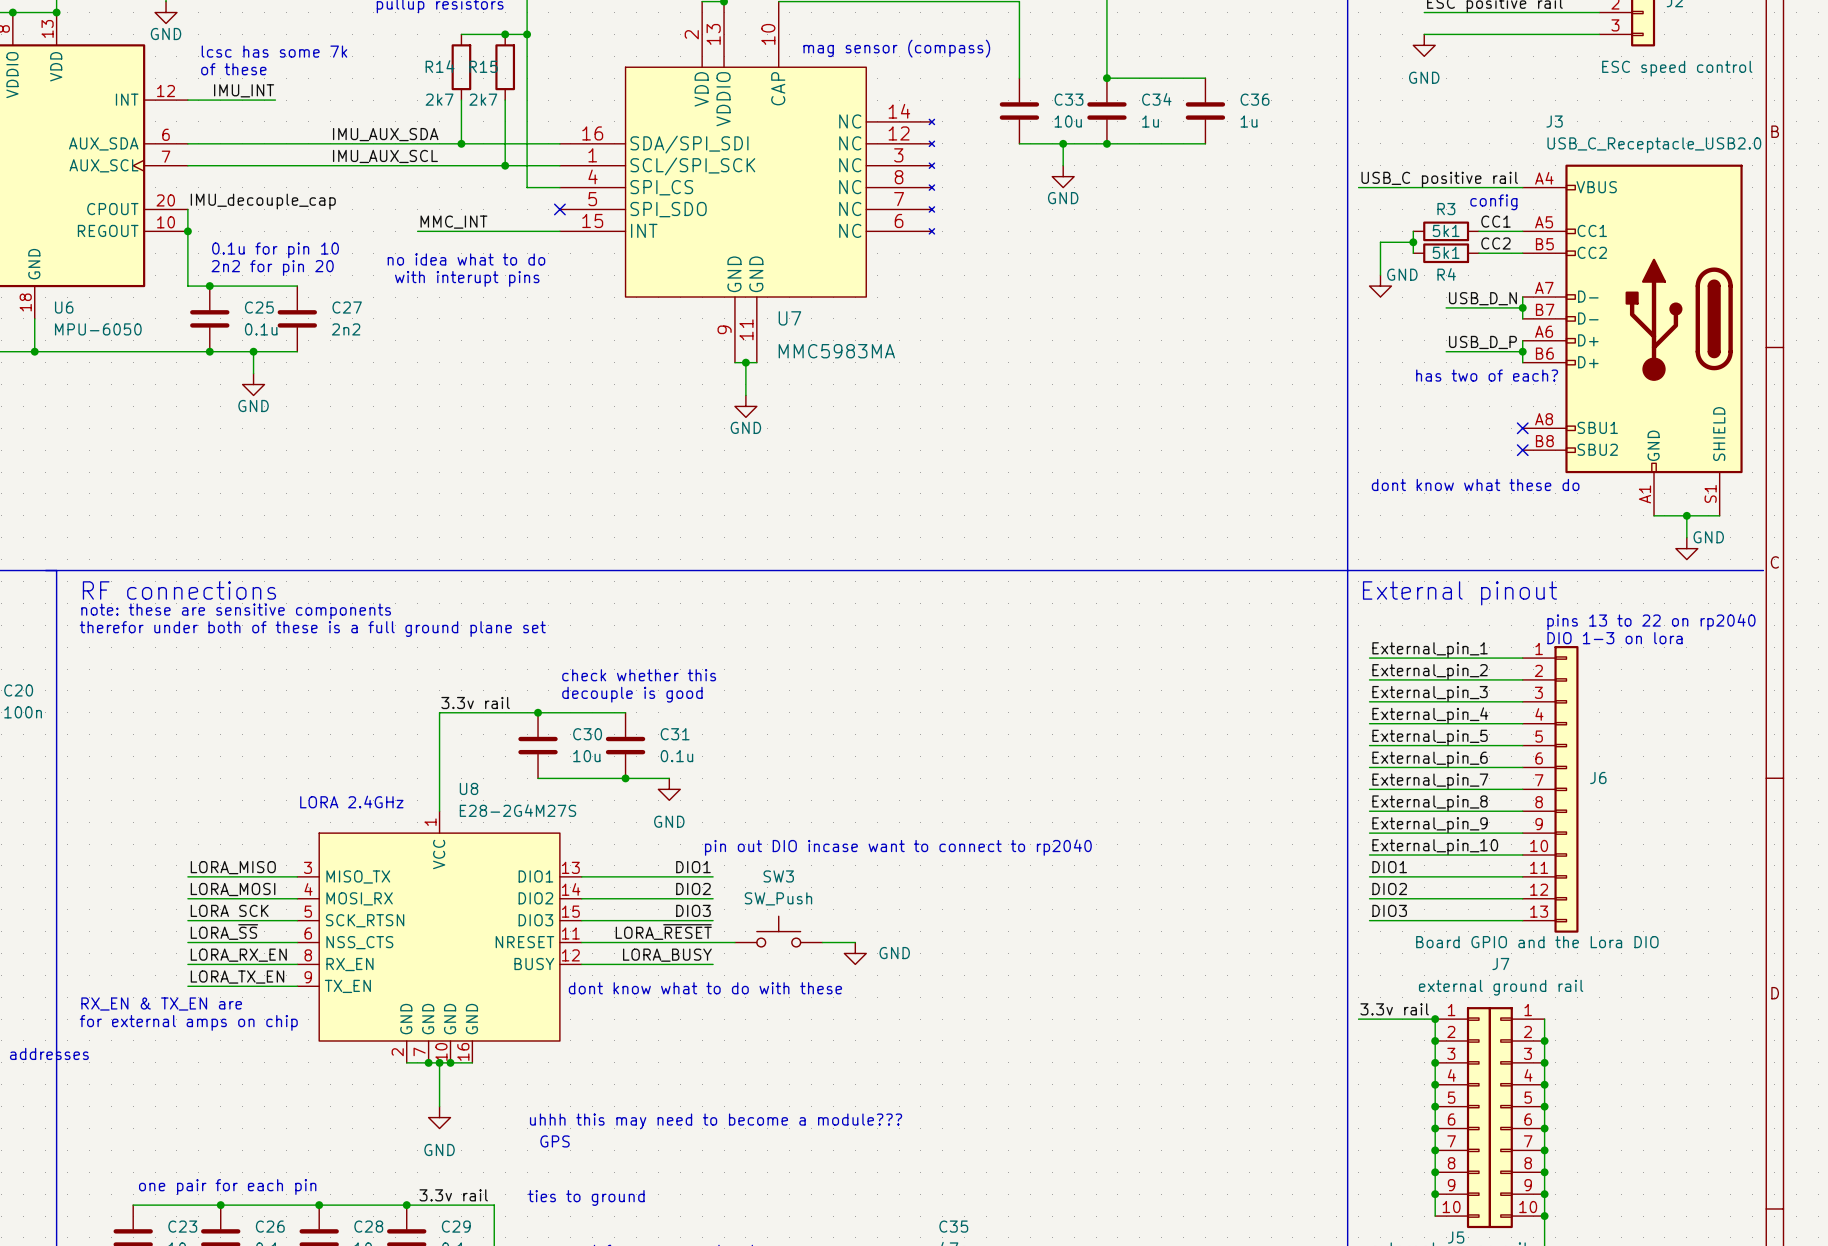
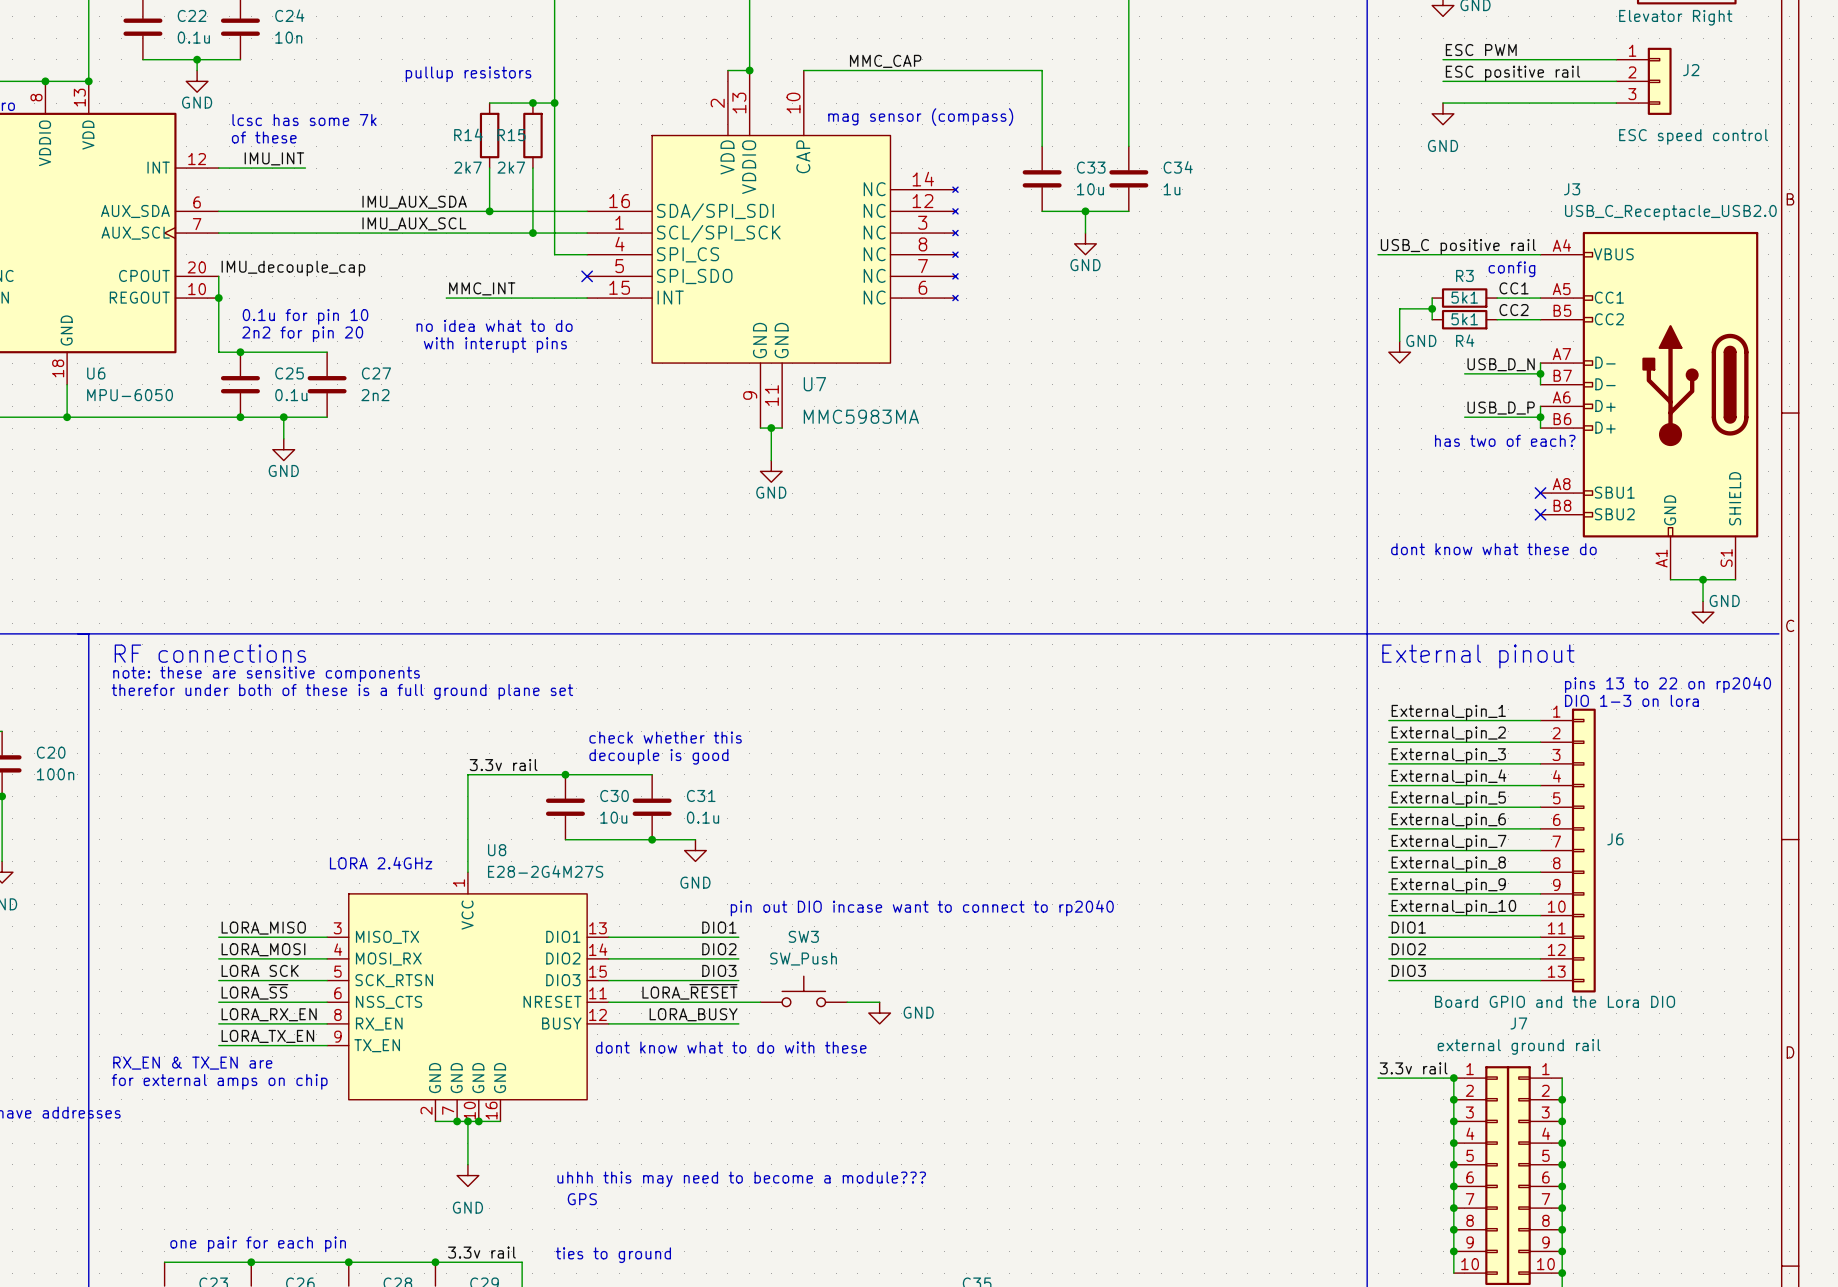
wire: (1106, 78) (1205, 78) -> none
junction: (1106, 78) -> none
C36: 1u (1205, 111) -> none
wire: (1106, 143) (1205, 143) -> none
junction: (1106, 143) -> none

